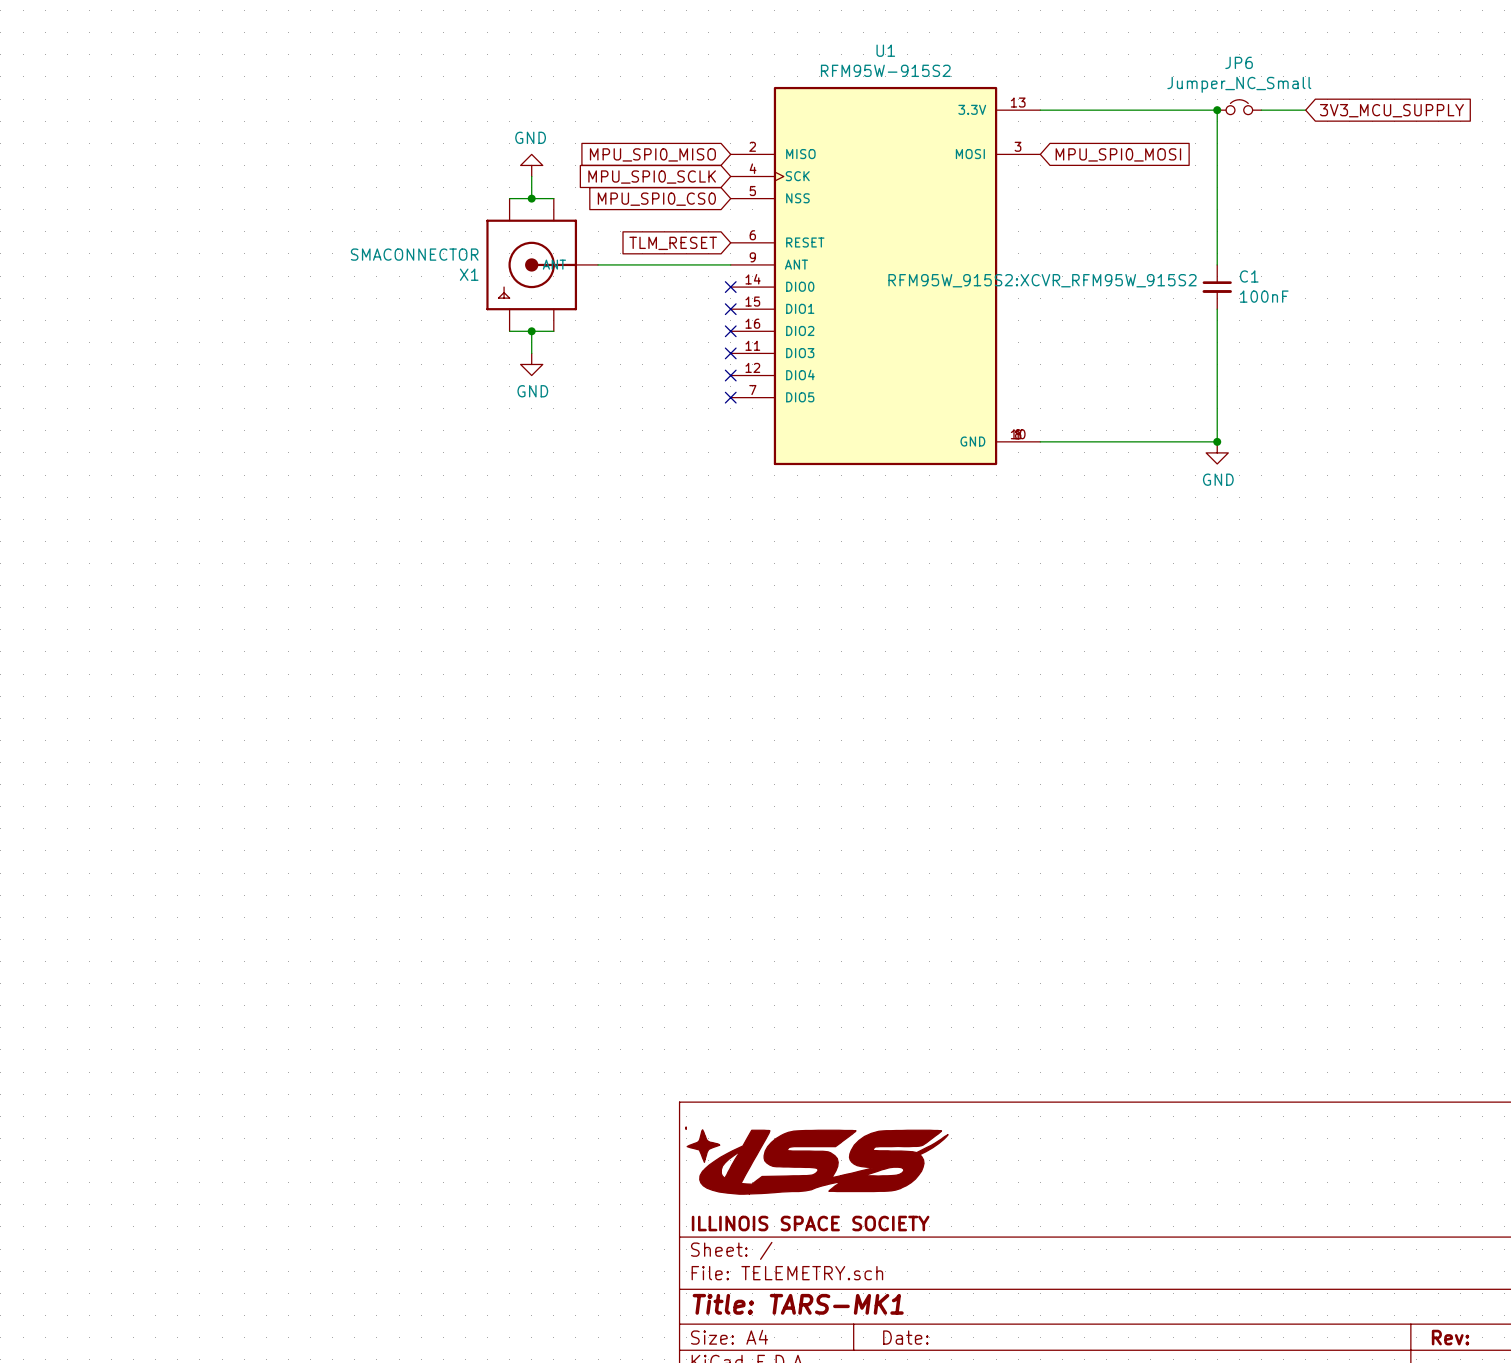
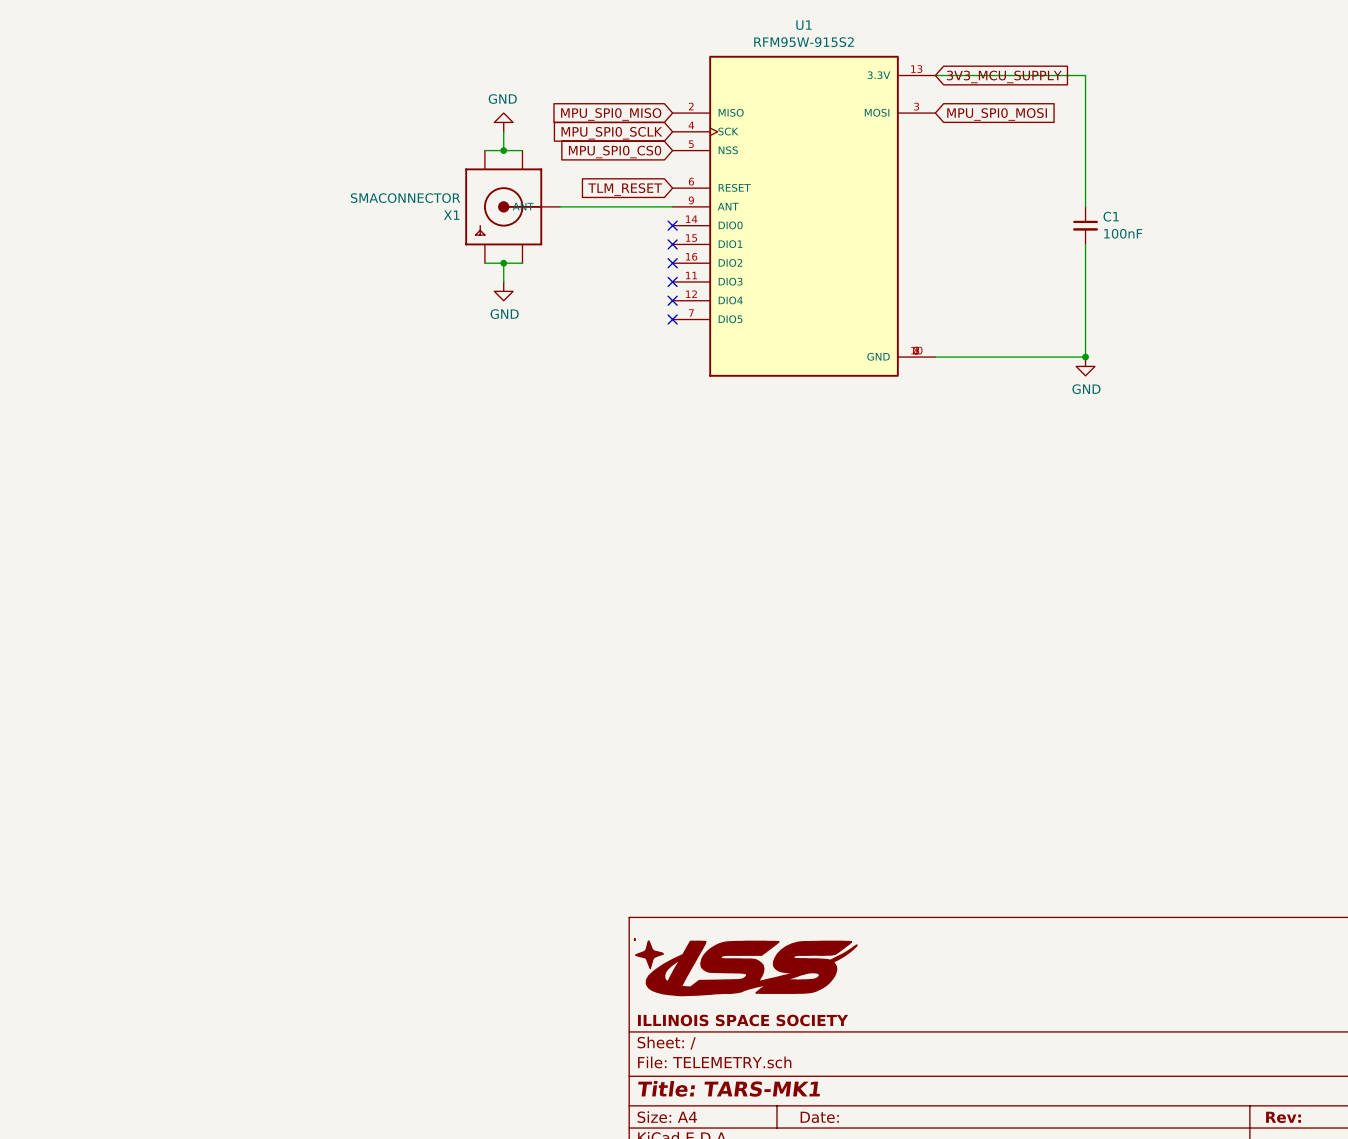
JP6: Jumper_NC_Small (1239, 107) -> none
global label: none -> 3V3_MCU_SUPPLY (1004, 76)
junction: (1217, 110) -> none
wire: (1261, 110) (1305, 110) -> none
global label: 3V3_MCU_SUPPLY (1391, 110) -> none
U1 text: RFM95W_915S2:XCVR_RFM95W_915S2 (1042, 280) -> none

